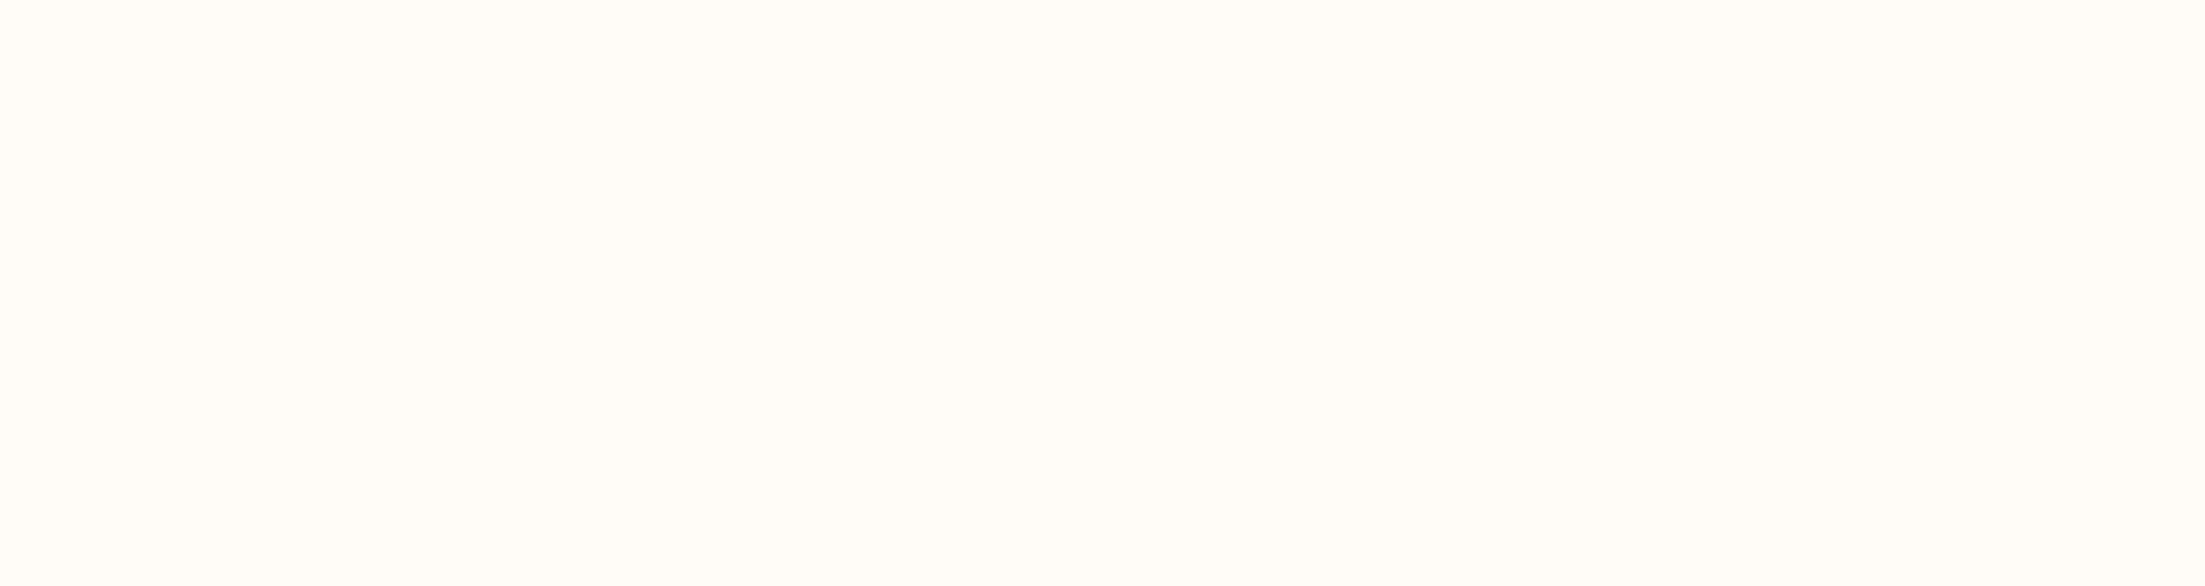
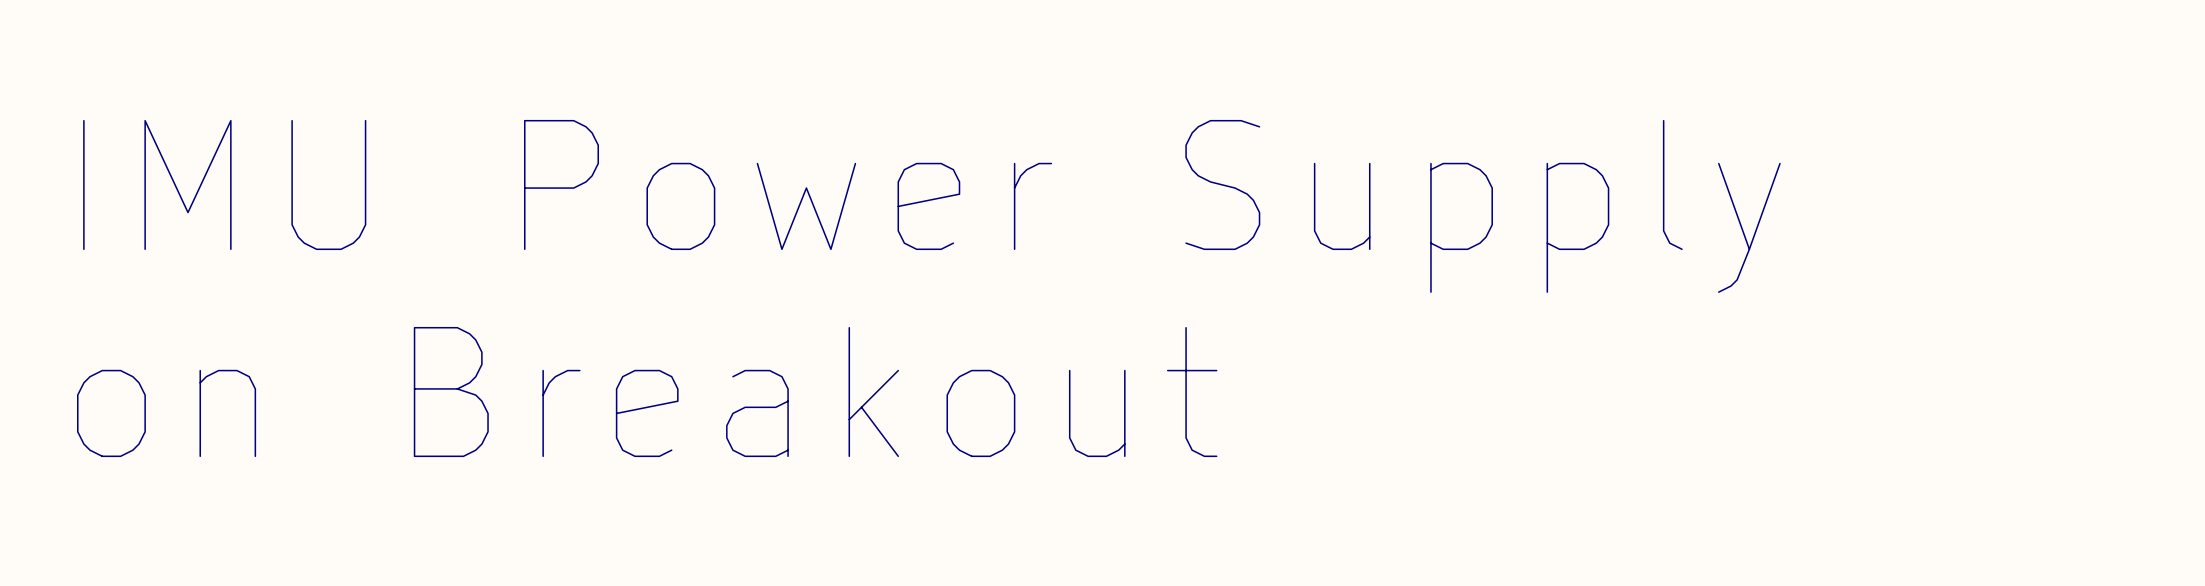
text: none -> IMU Power Supply (931, 206)
text: none -> on Breakout (647, 392)

